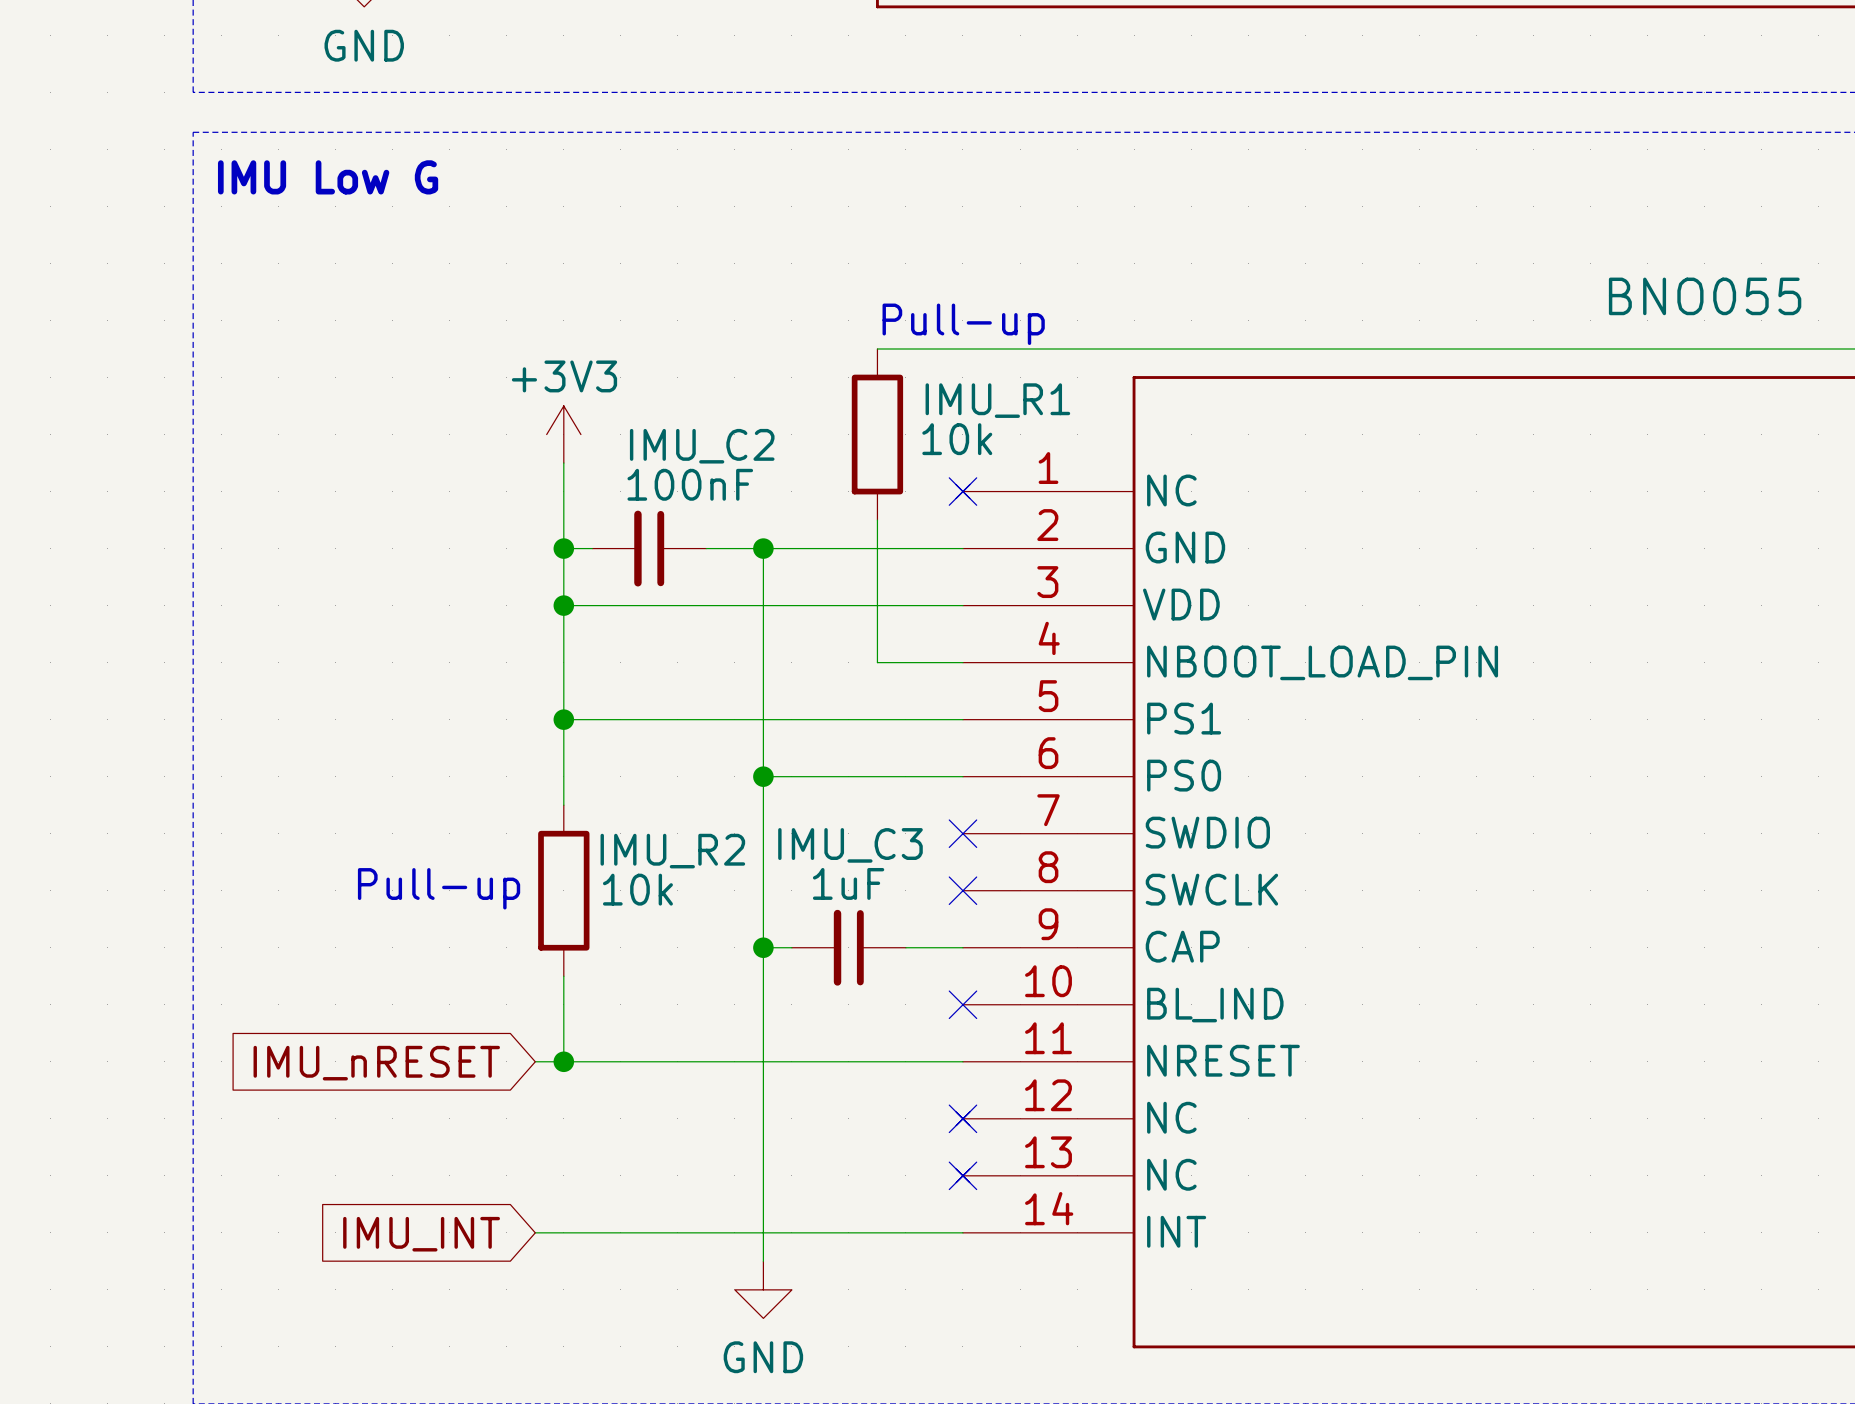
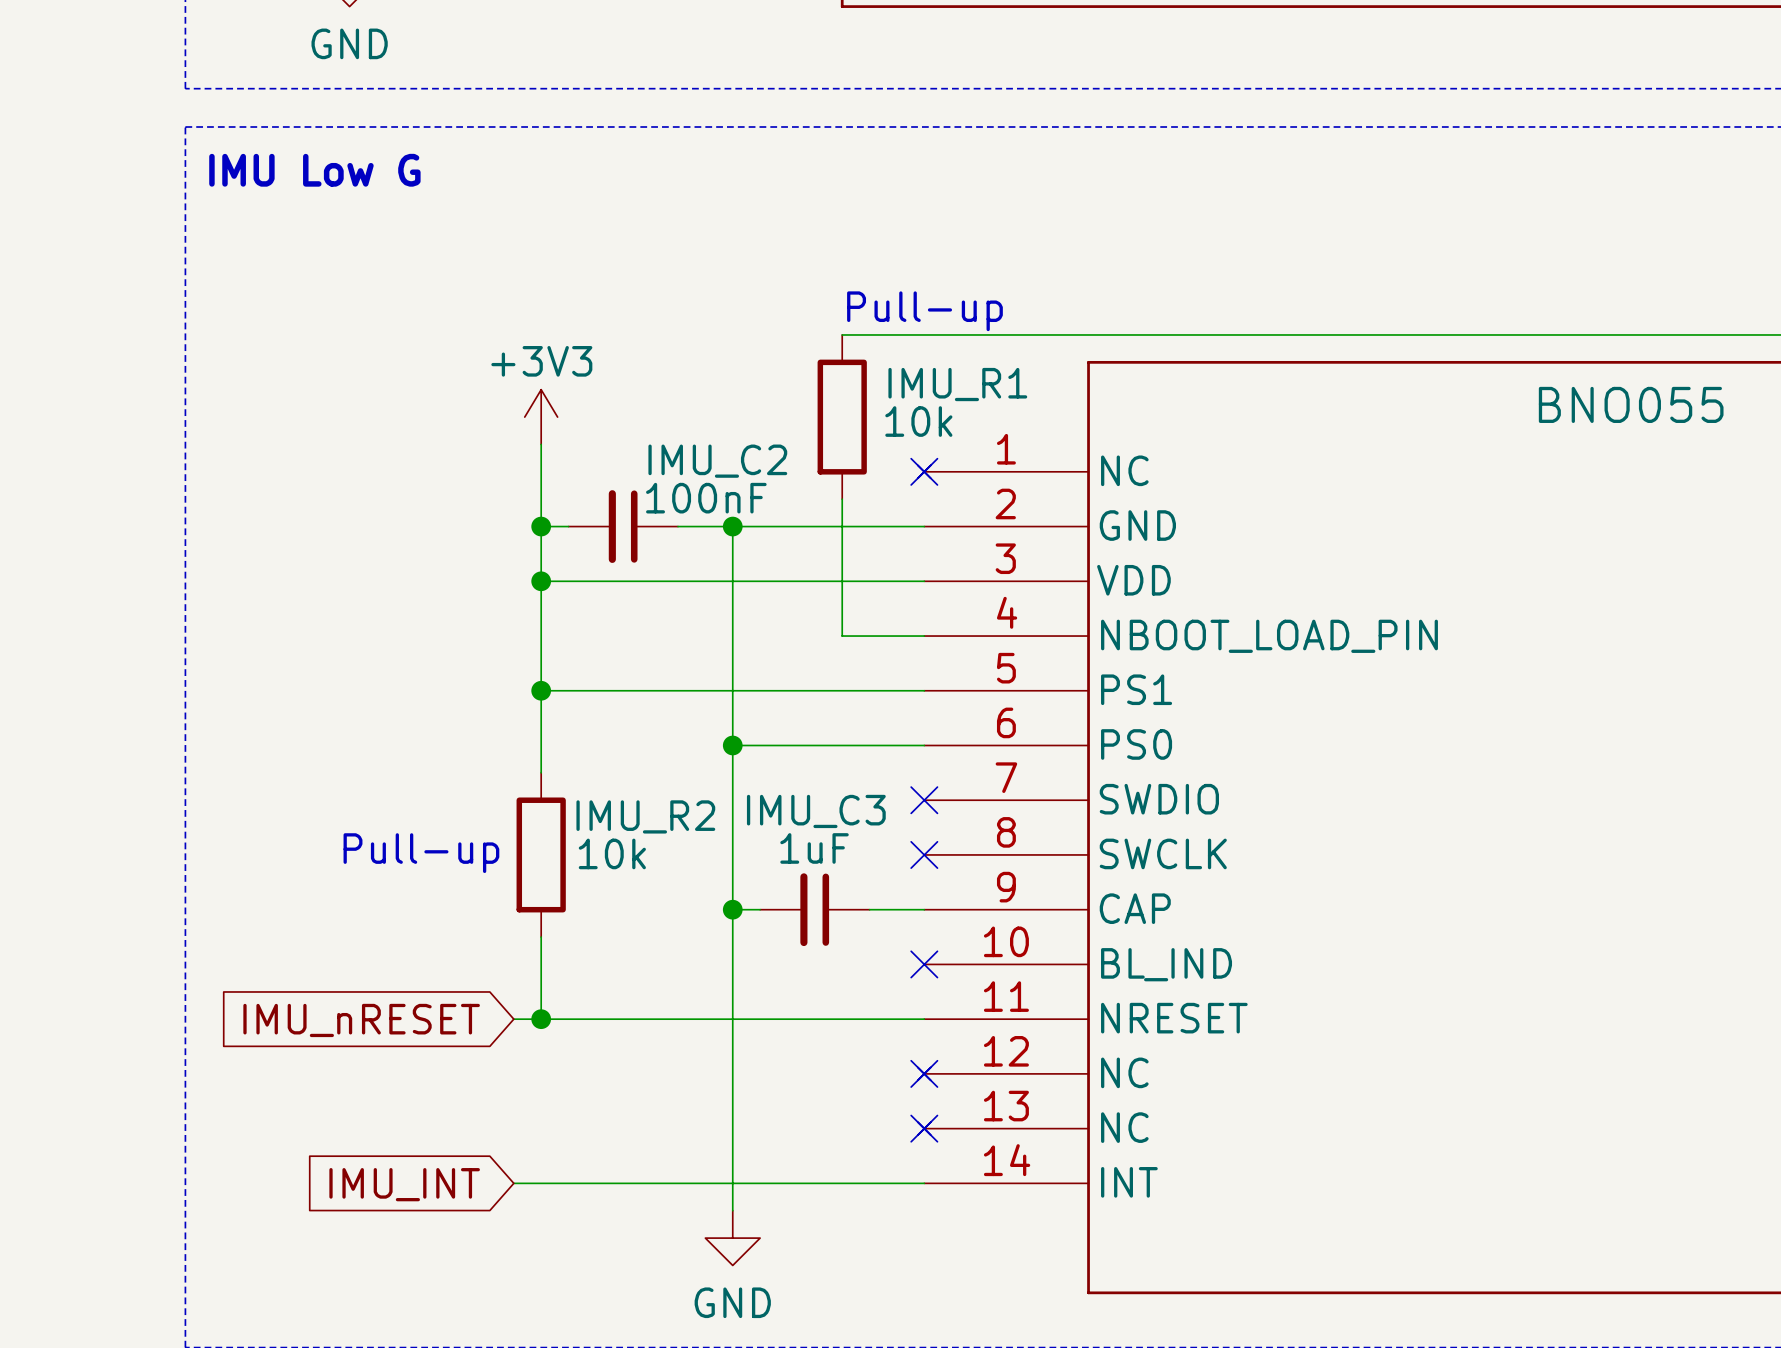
part value position: BNO055 (1705, 296) -> BNO055 (1631, 404)
IMU_C2 name position: IMU_C2 (702, 446) -> IMU_C2 (717, 461)
IMU_C2 value position: 100nF (690, 484) -> 100nF (706, 498)

